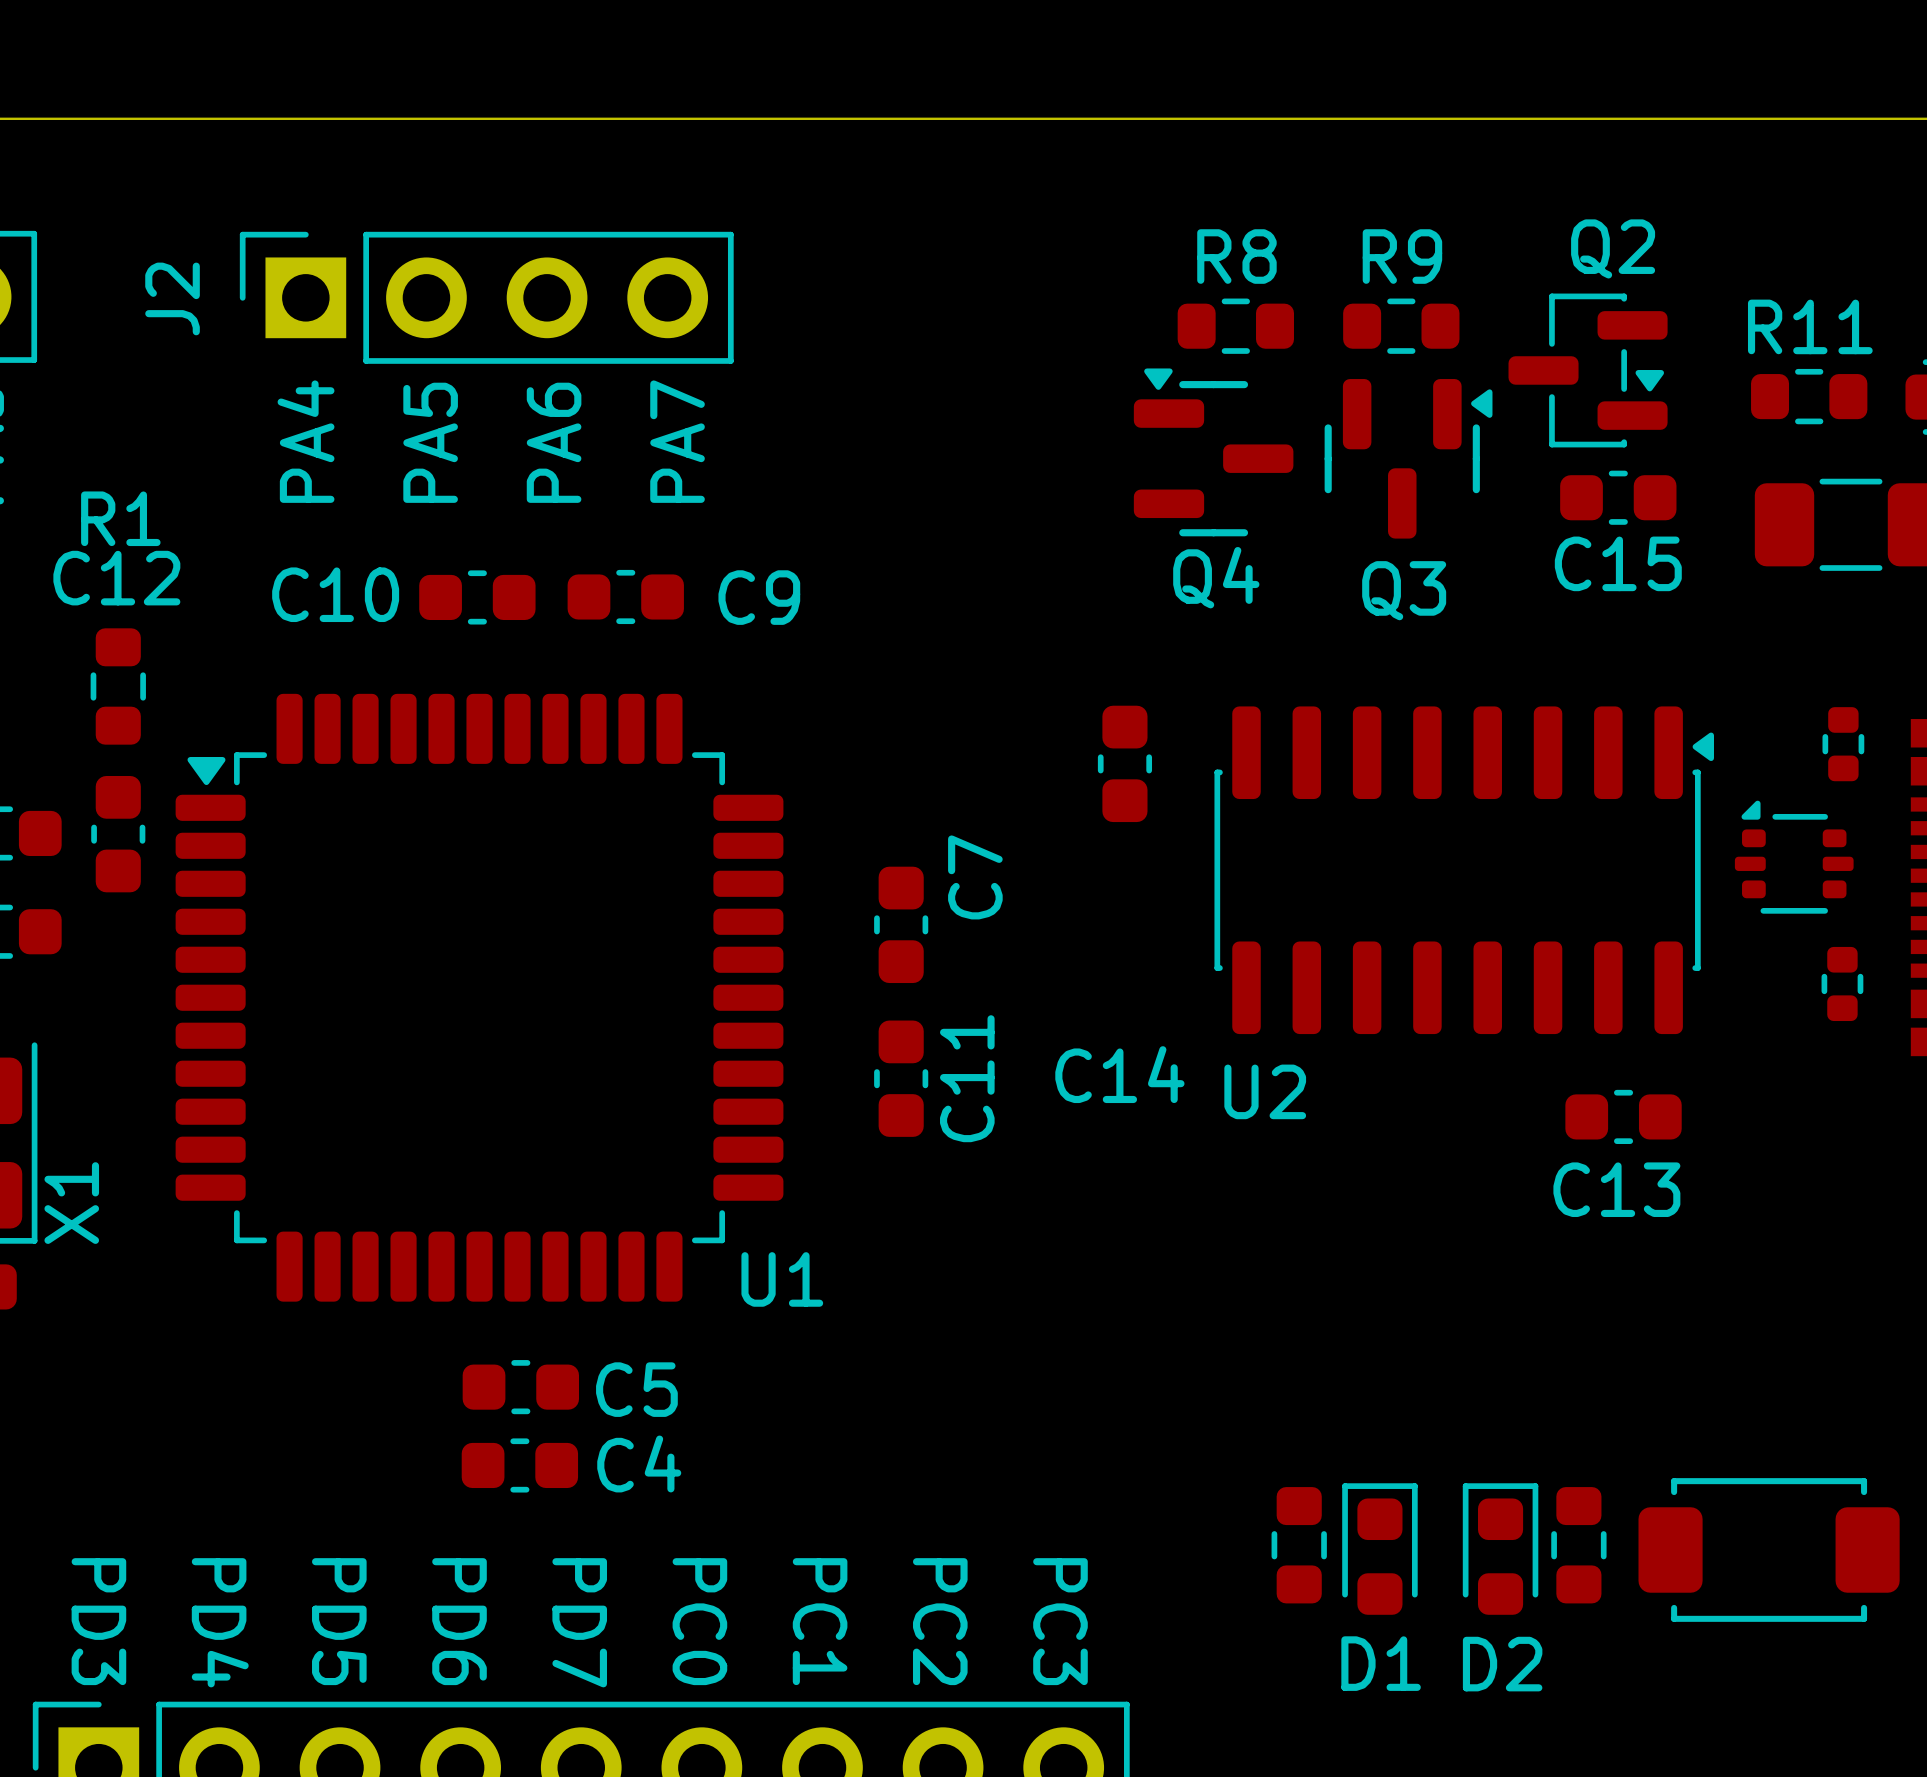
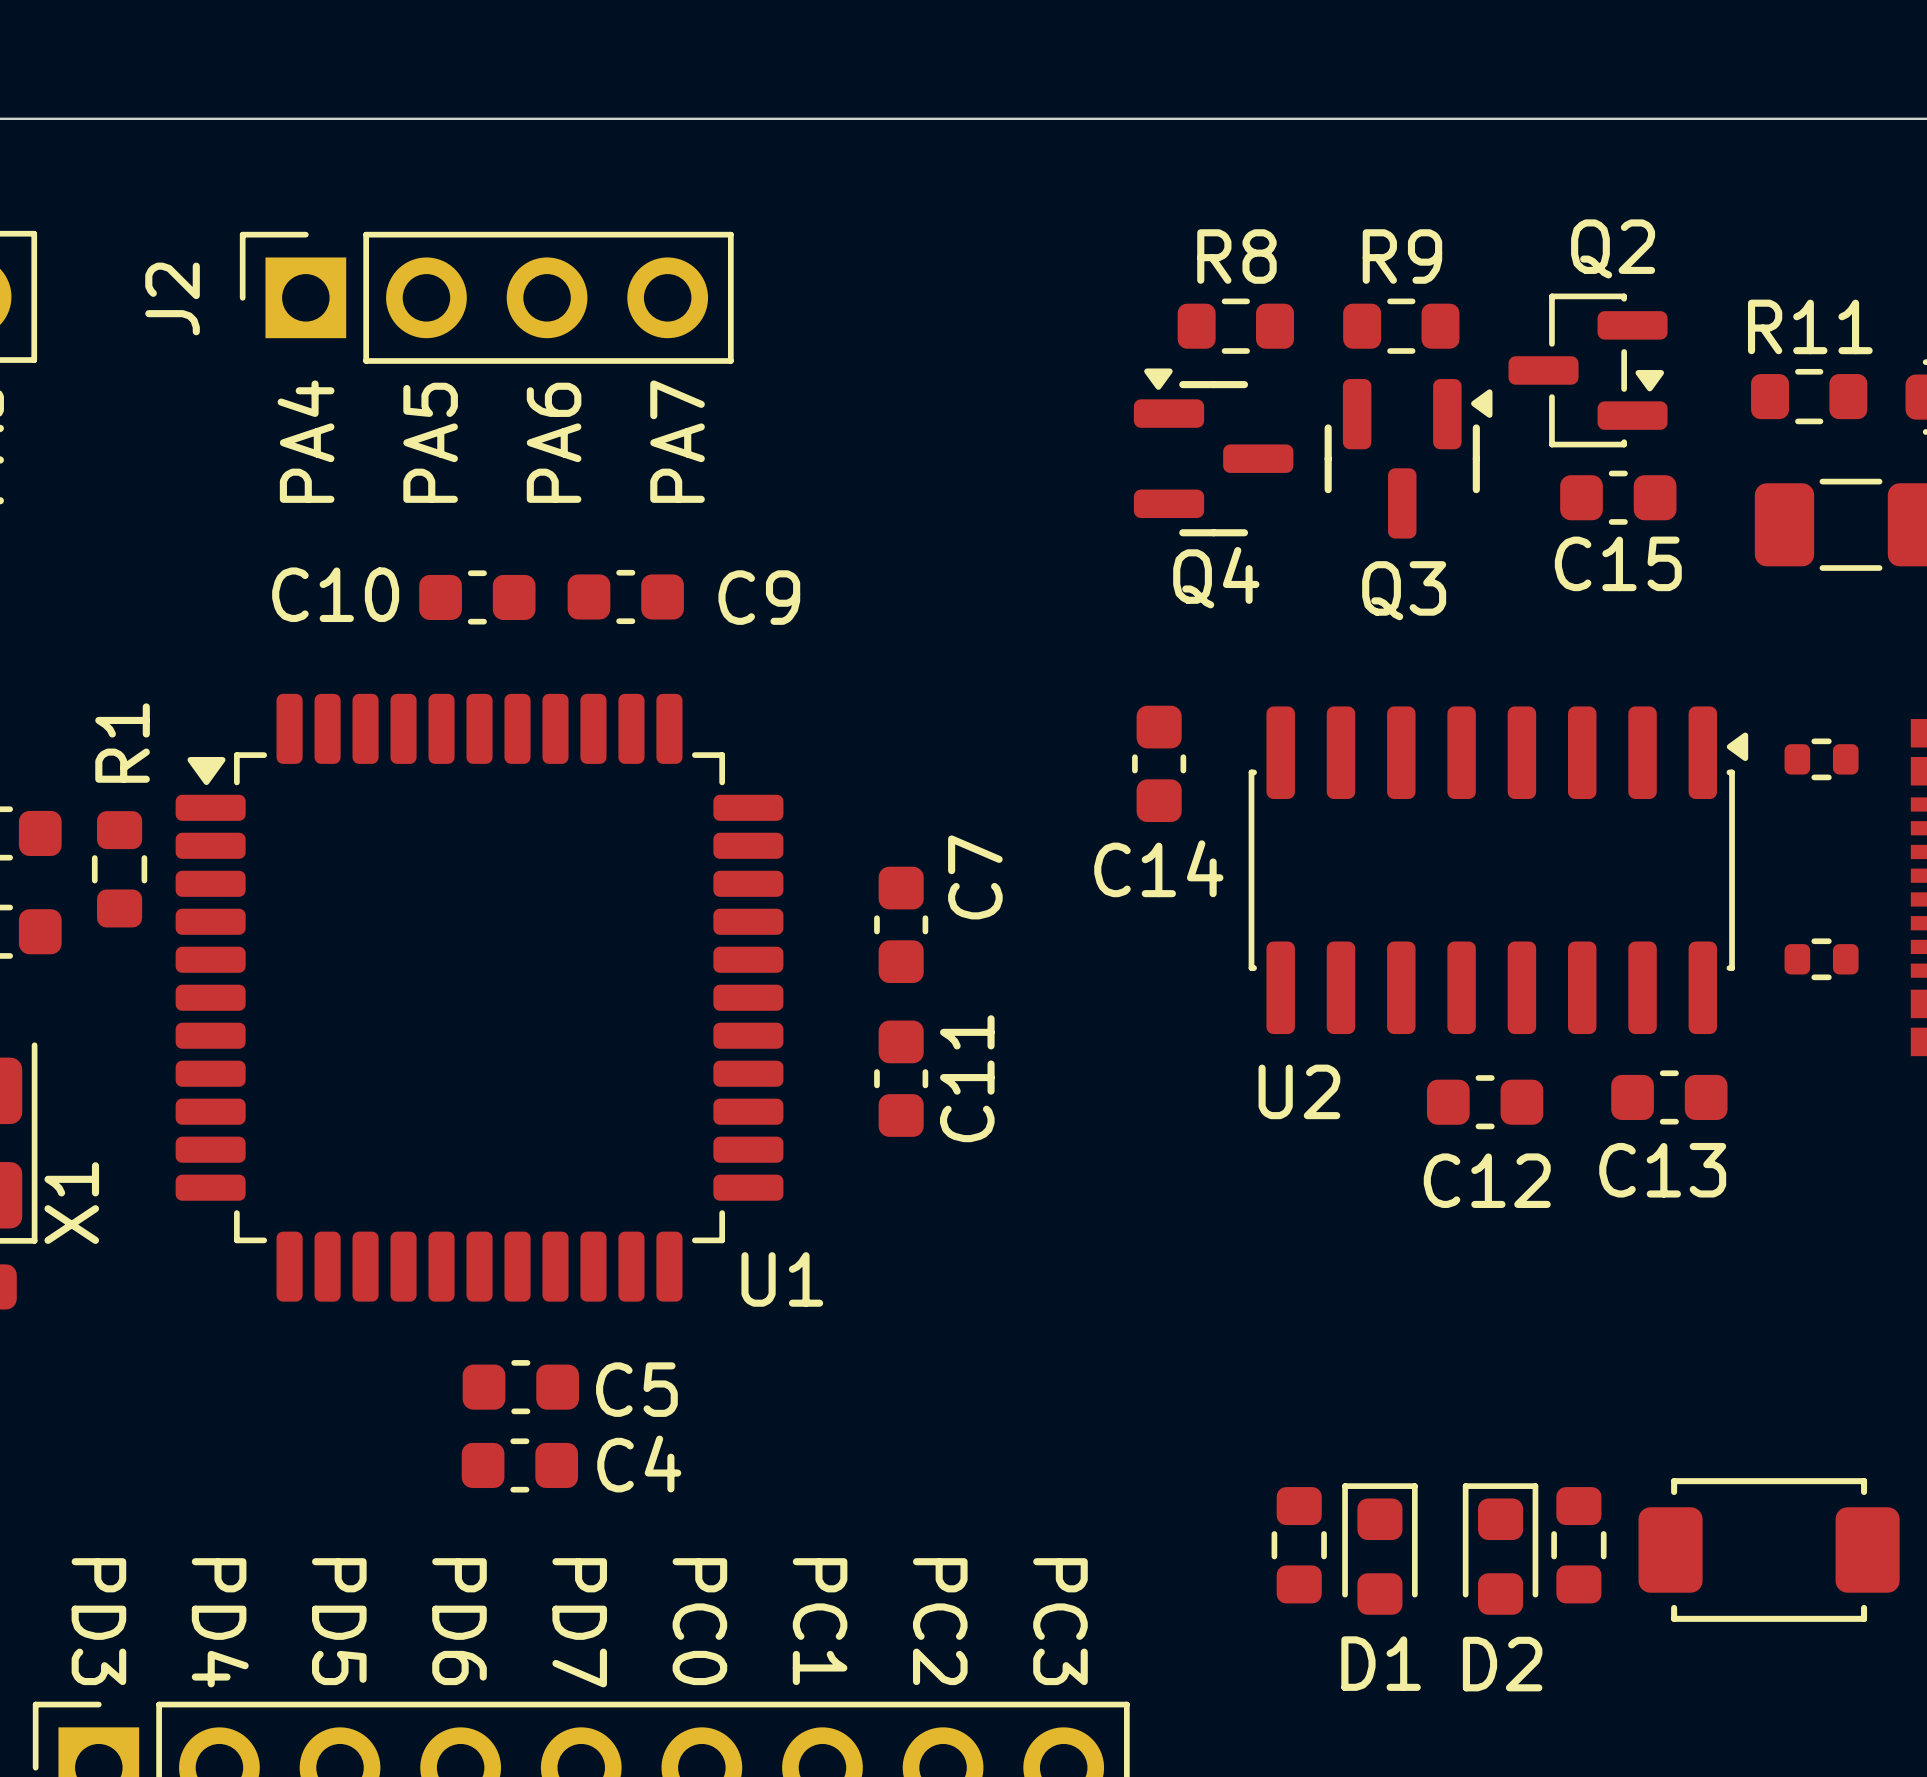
R1 name rotation: 0° (120, 518) -> 90° counterclockwise (122, 743)
C12 name position: C12 (116, 578) -> C12 (1487, 1180)
R1 position: (118, 686) -> (119, 869)
part rotation: 0° (1843, 744) -> 90° clockwise (1821, 759)
C14 position: (1124, 763) -> (1159, 763)
C12 rotation: 0° (118, 834) -> 90° clockwise (1485, 1102)
C12 position: (118, 834) -> (1485, 1102)
part: (1794, 857) -> none
U2 position: (1464, 870) -> (1498, 870)
part rotation: 0° (1842, 983) -> 90° clockwise (1821, 959)
C14 name position: C14 (1119, 1074) -> C14 (1158, 868)
C13 position: (1623, 1116) -> (1669, 1097)

